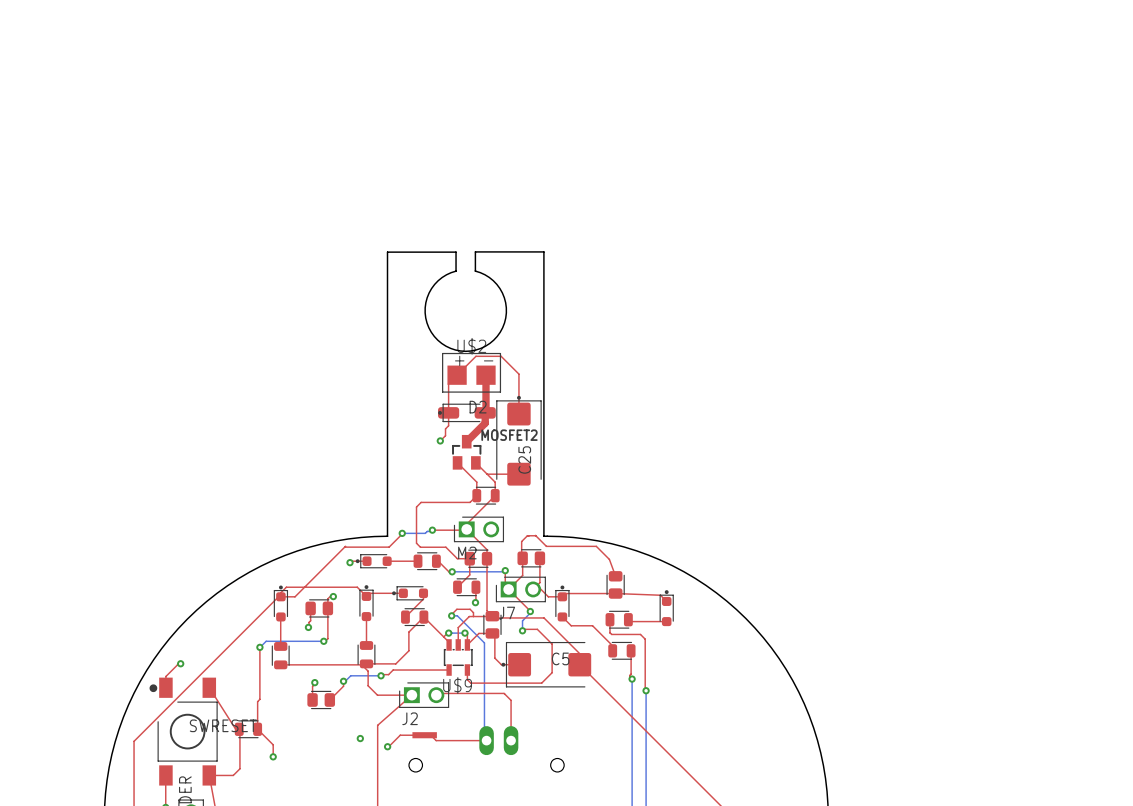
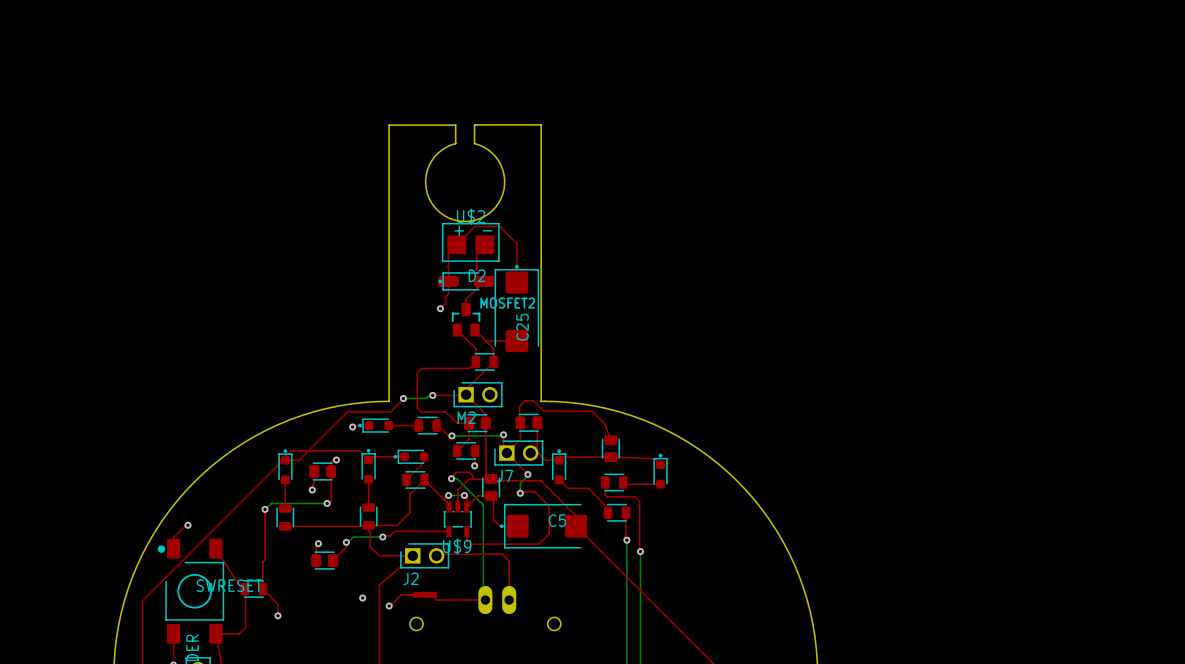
top track: (486, 375) (485, 423) (466, 441) -> (484, 281) (466, 299) (466, 309)
top track: none -> (476, 252) (476, 288)

